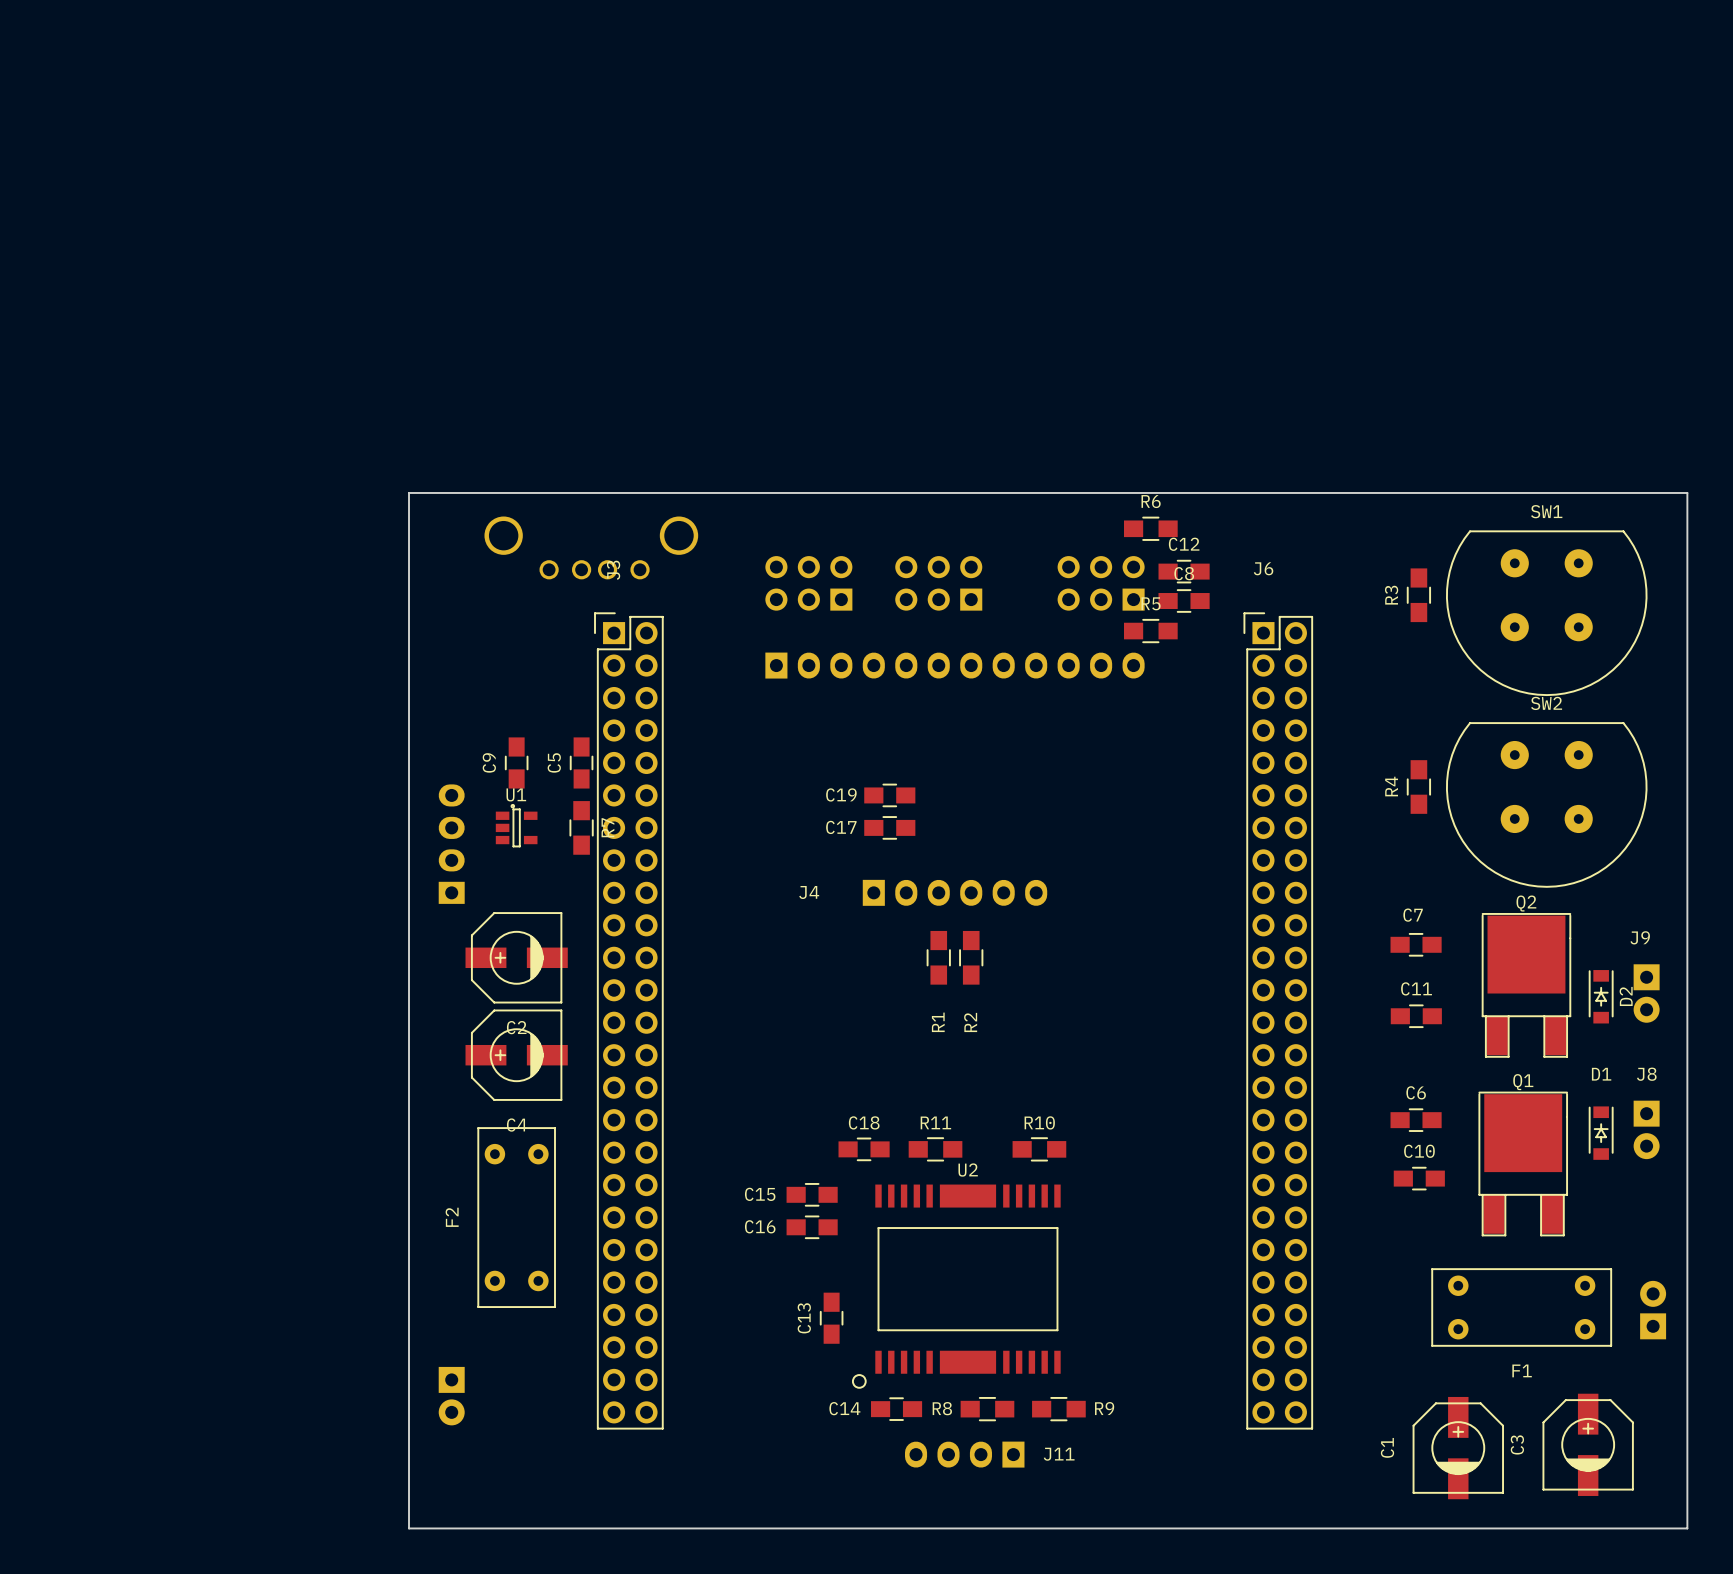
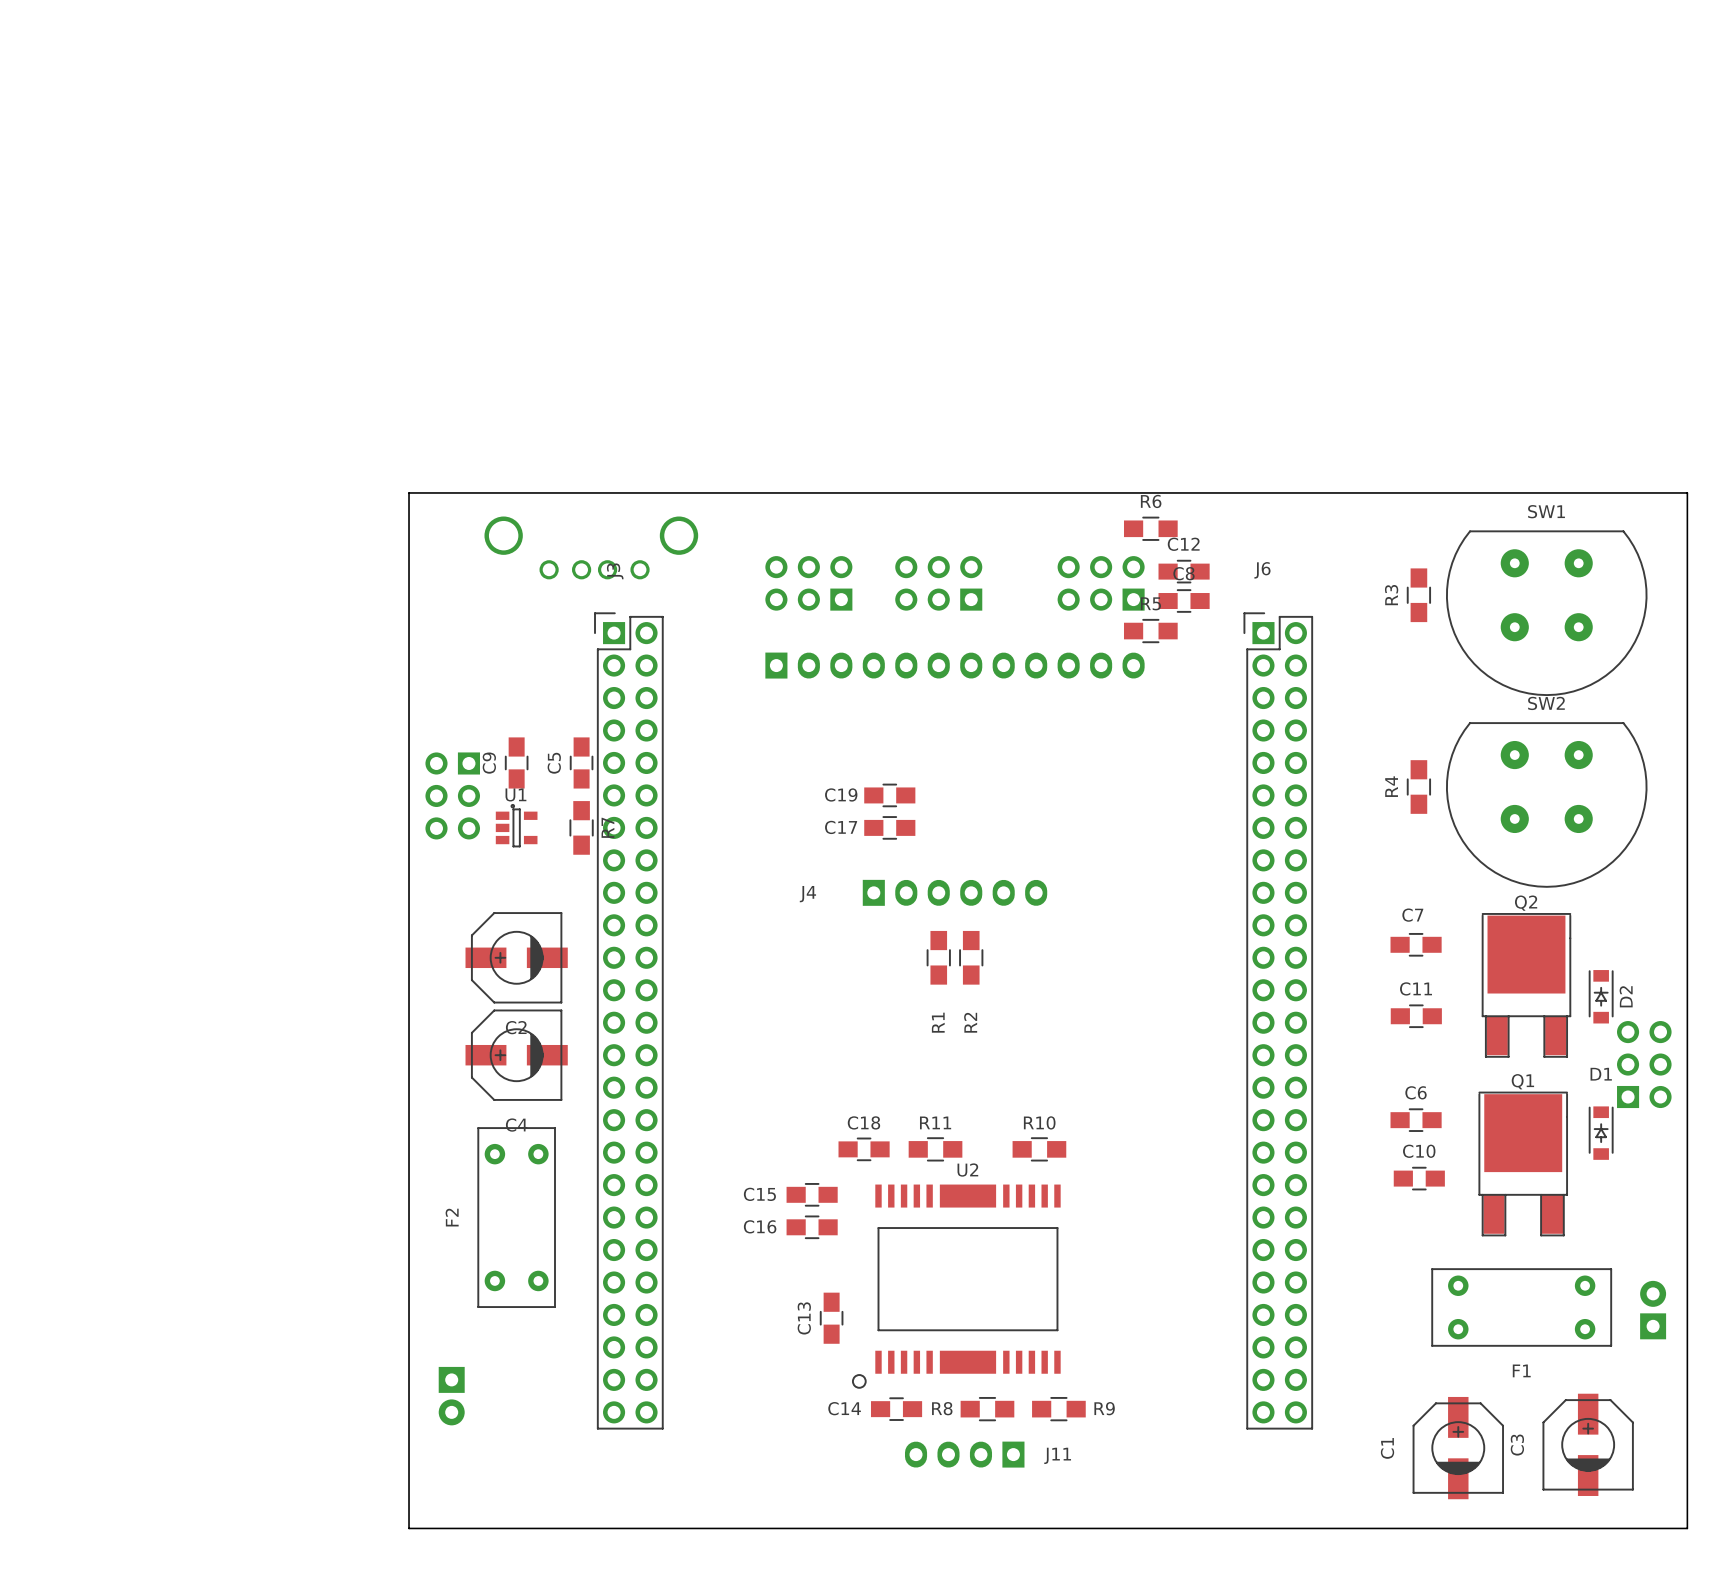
part: none -> (452, 795)
part: (451, 844) -> none
J9: (1646, 993) -> none
part: none -> (1644, 1064)
J8: (1646, 1129) -> none

